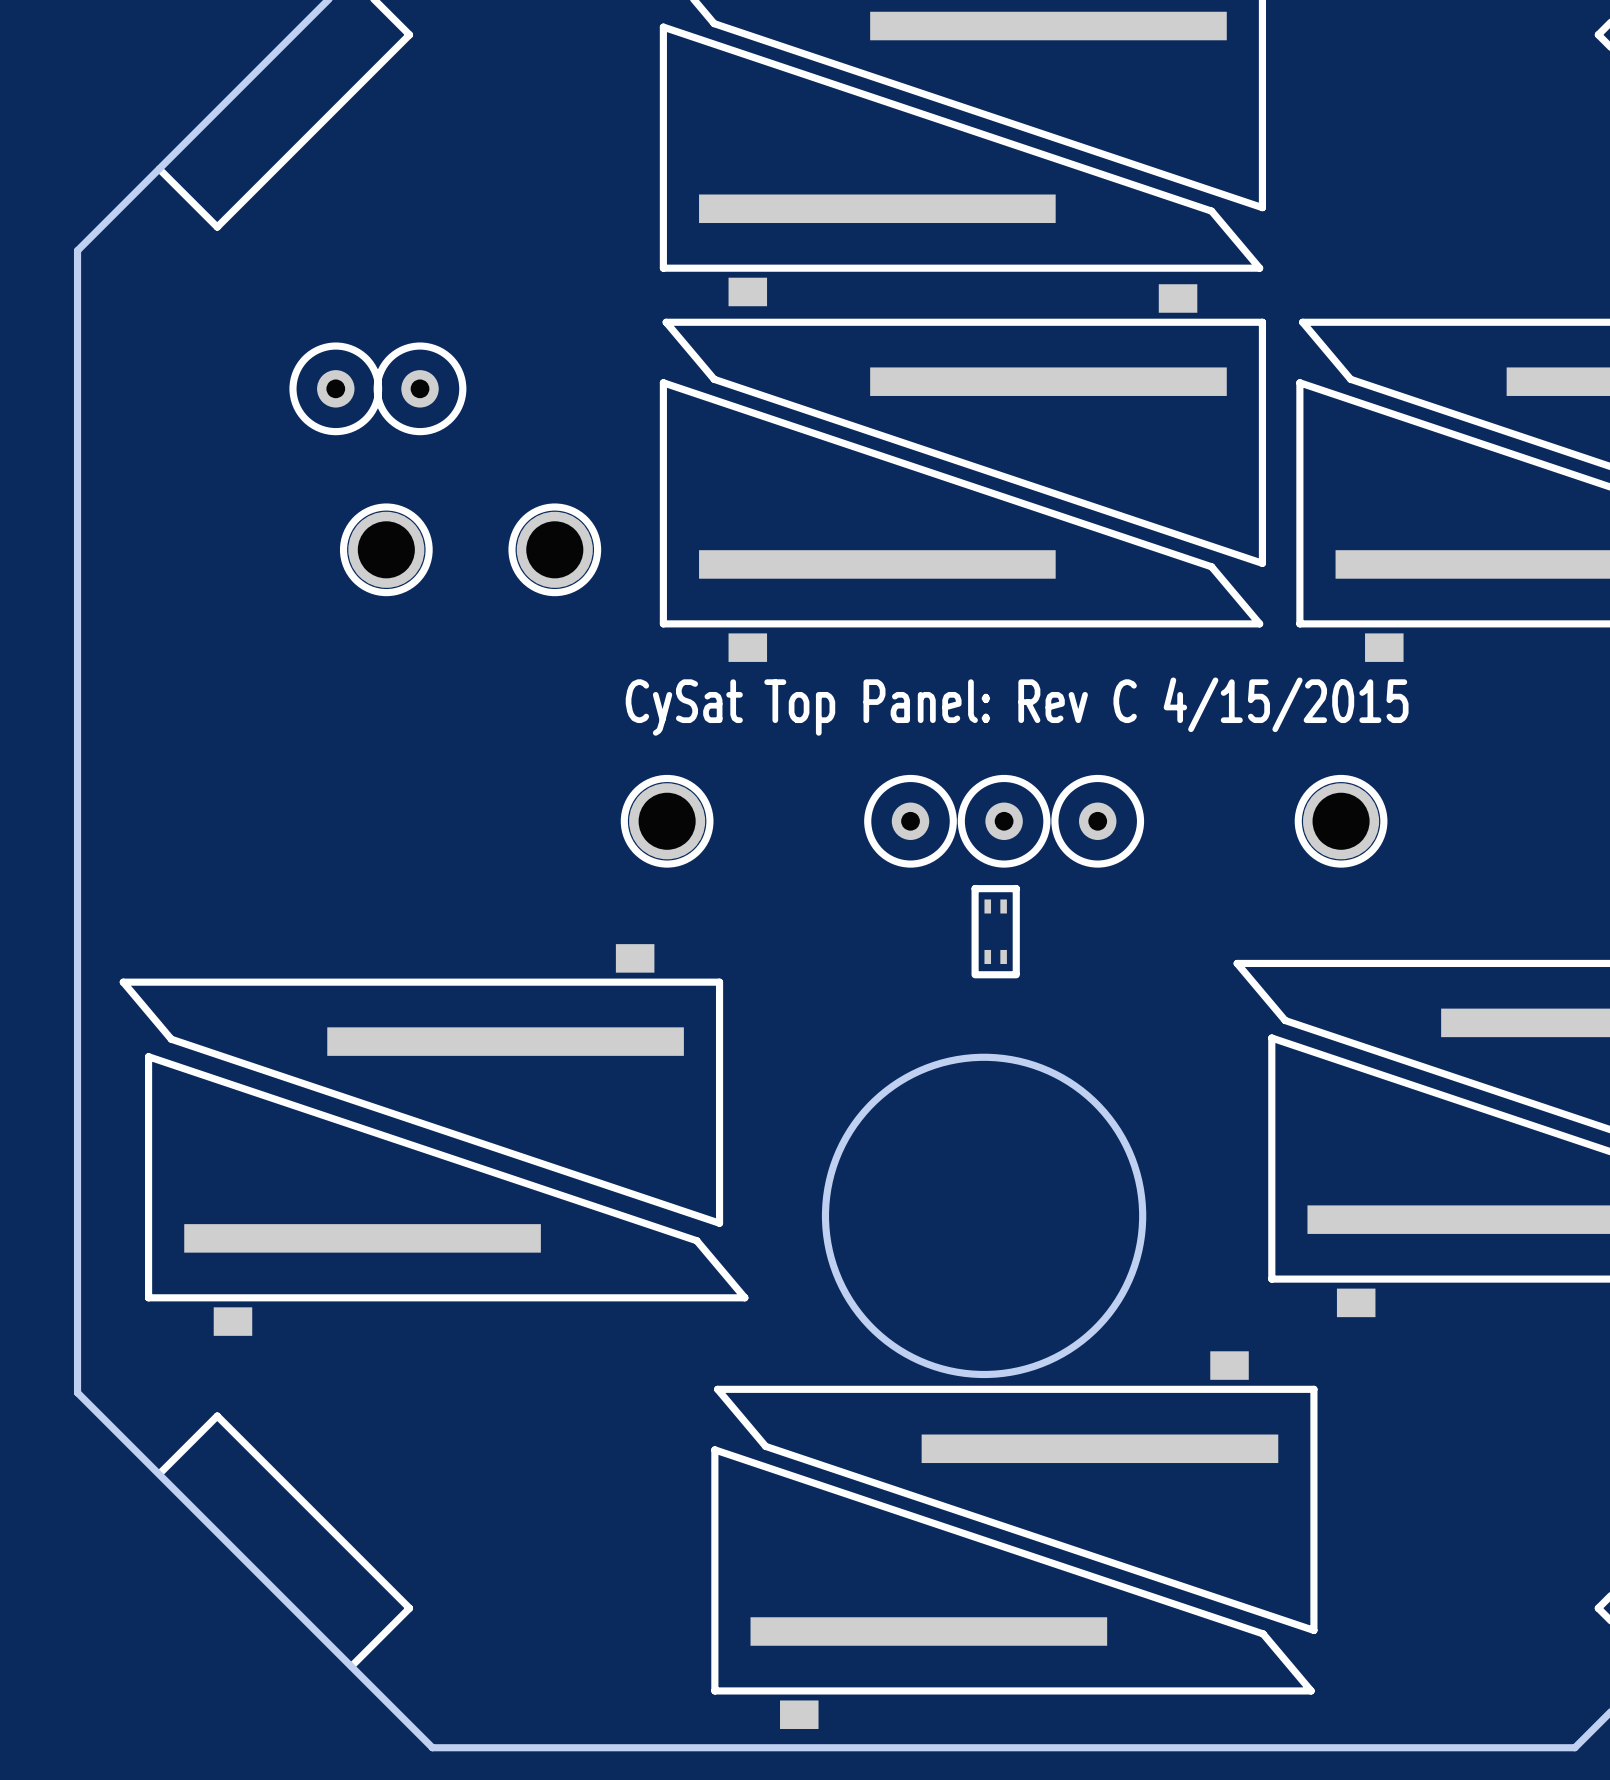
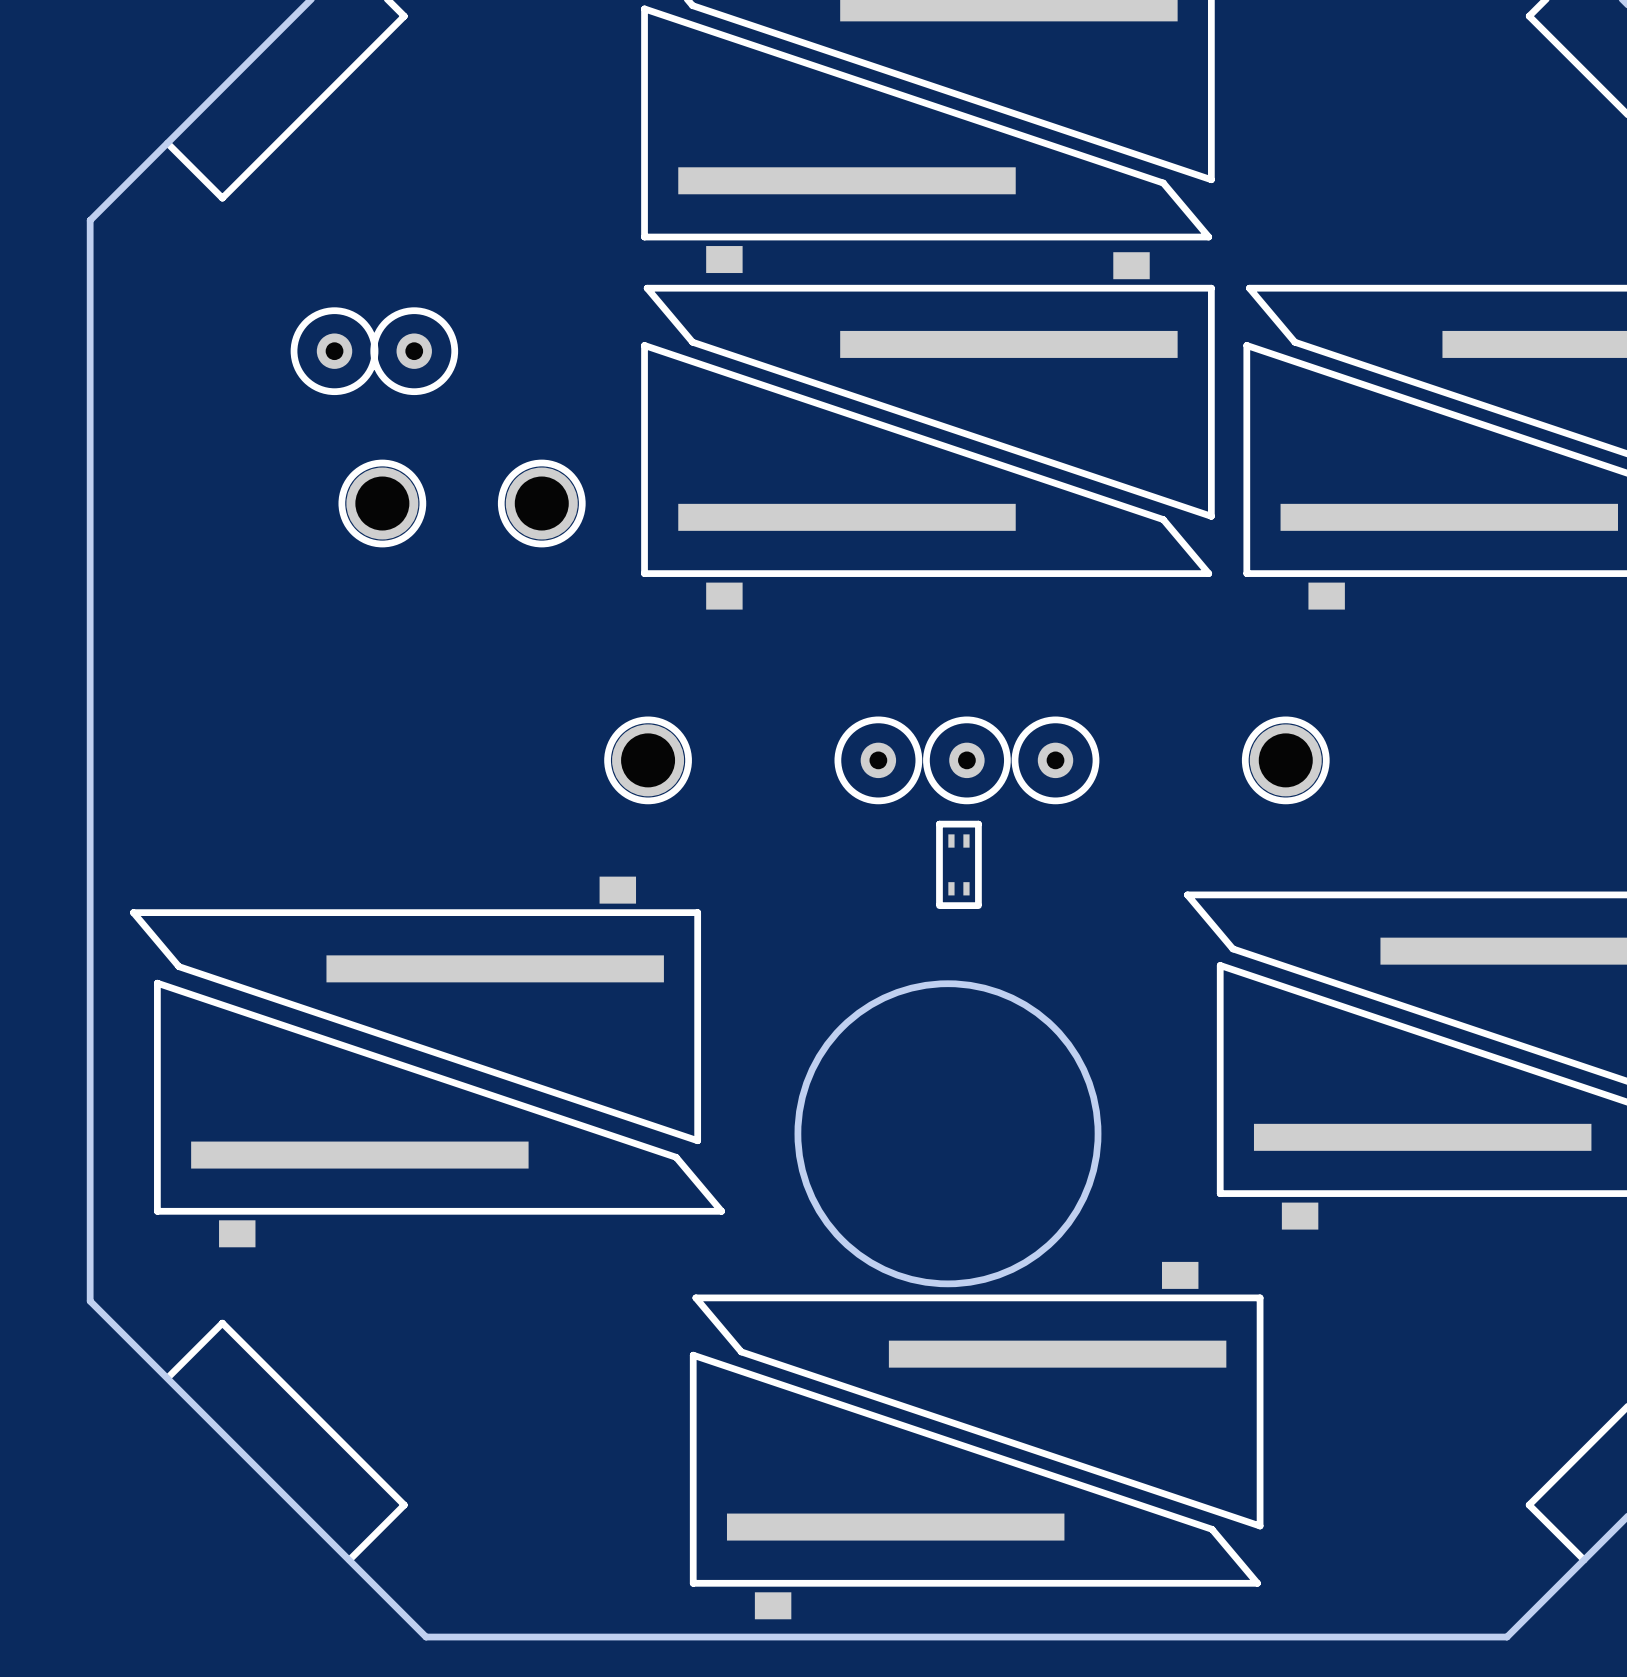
text: CySat Top Panel: Rev C 4/15/2015 (1017, 706) -> none

